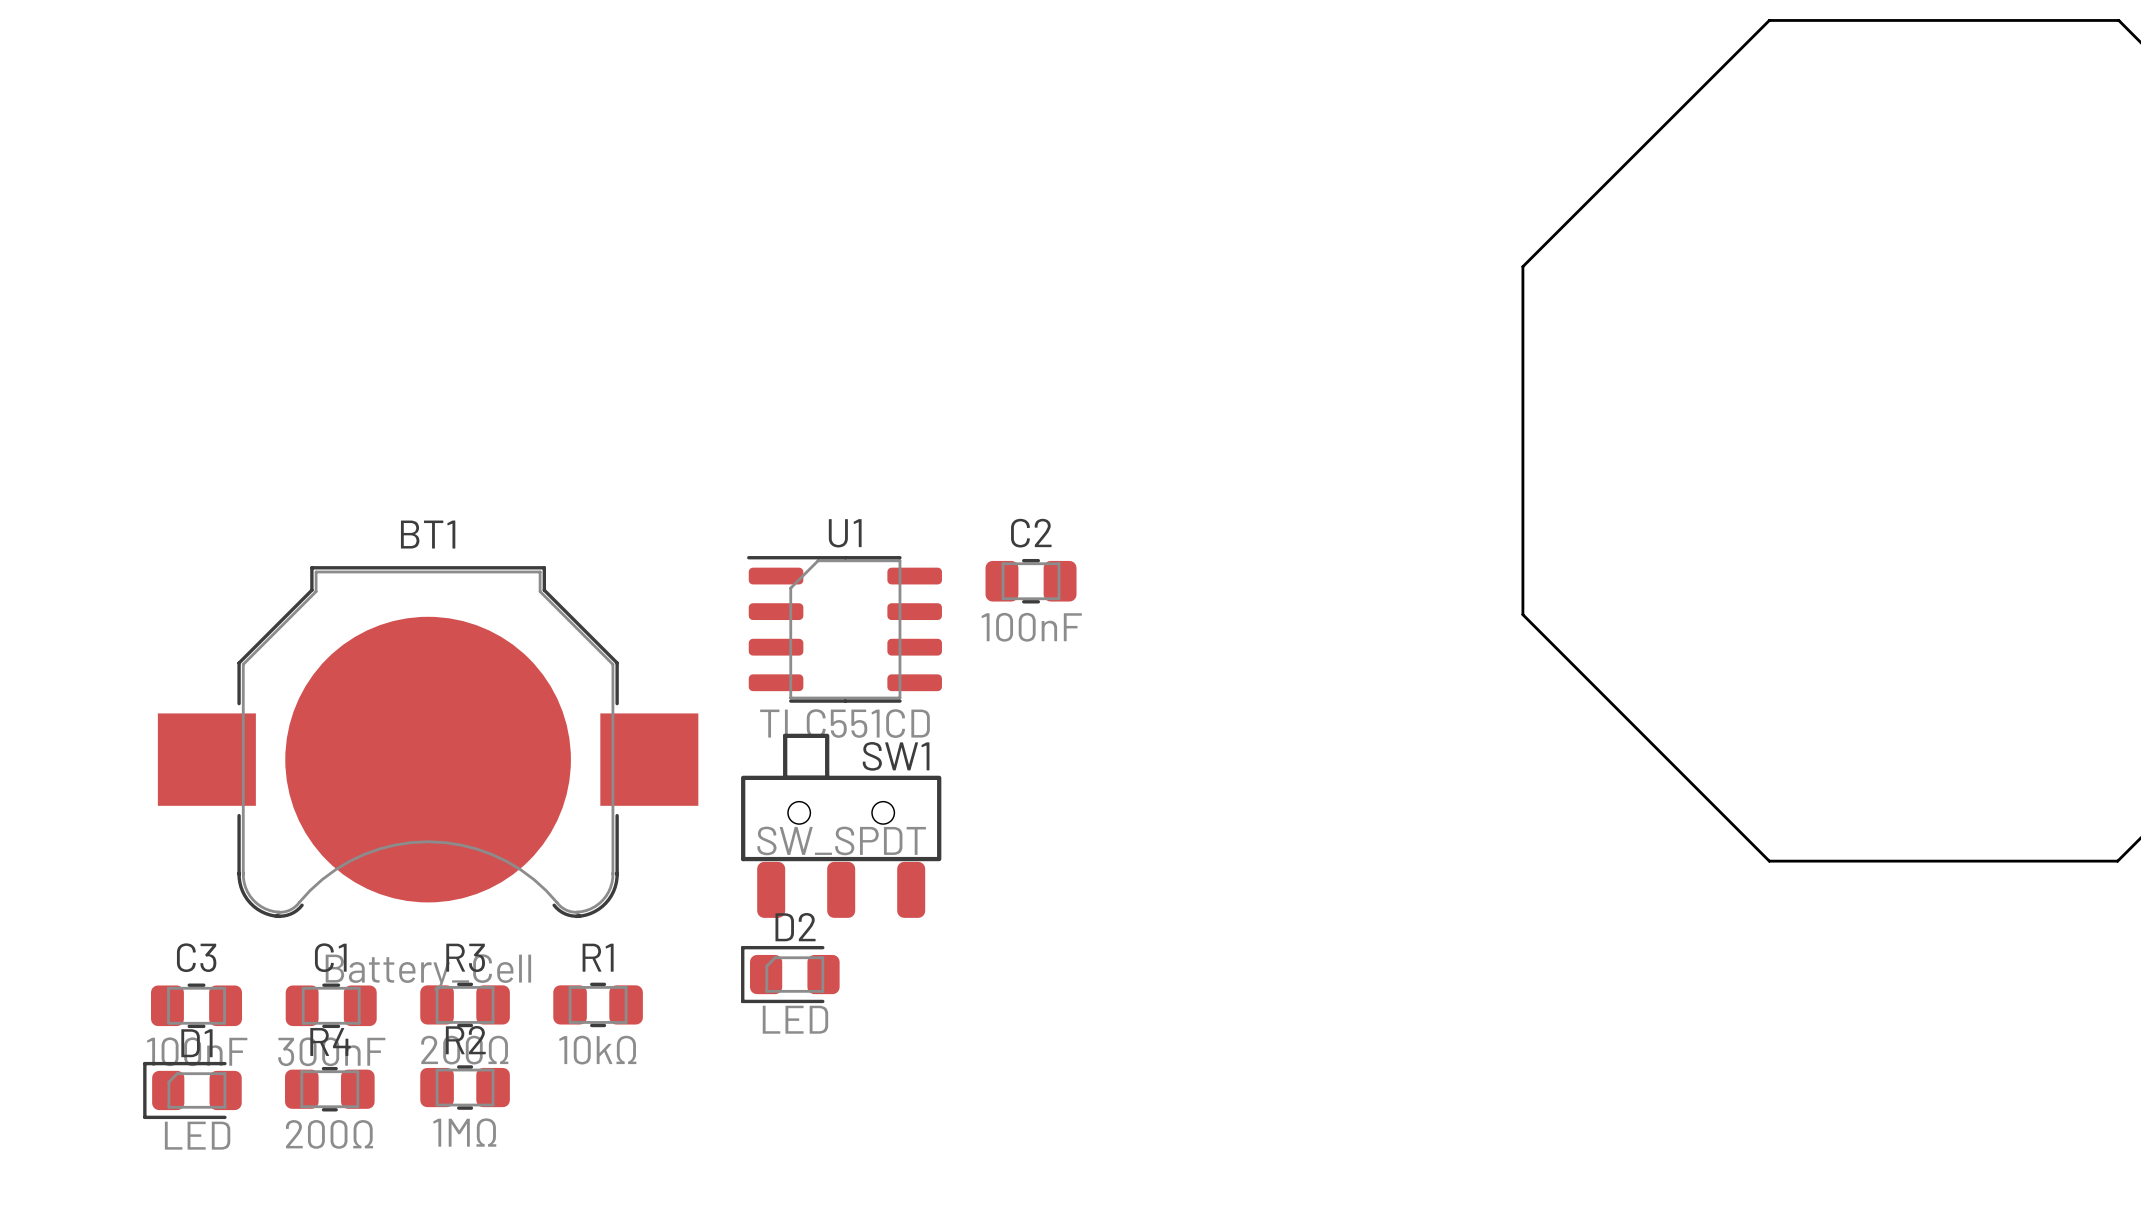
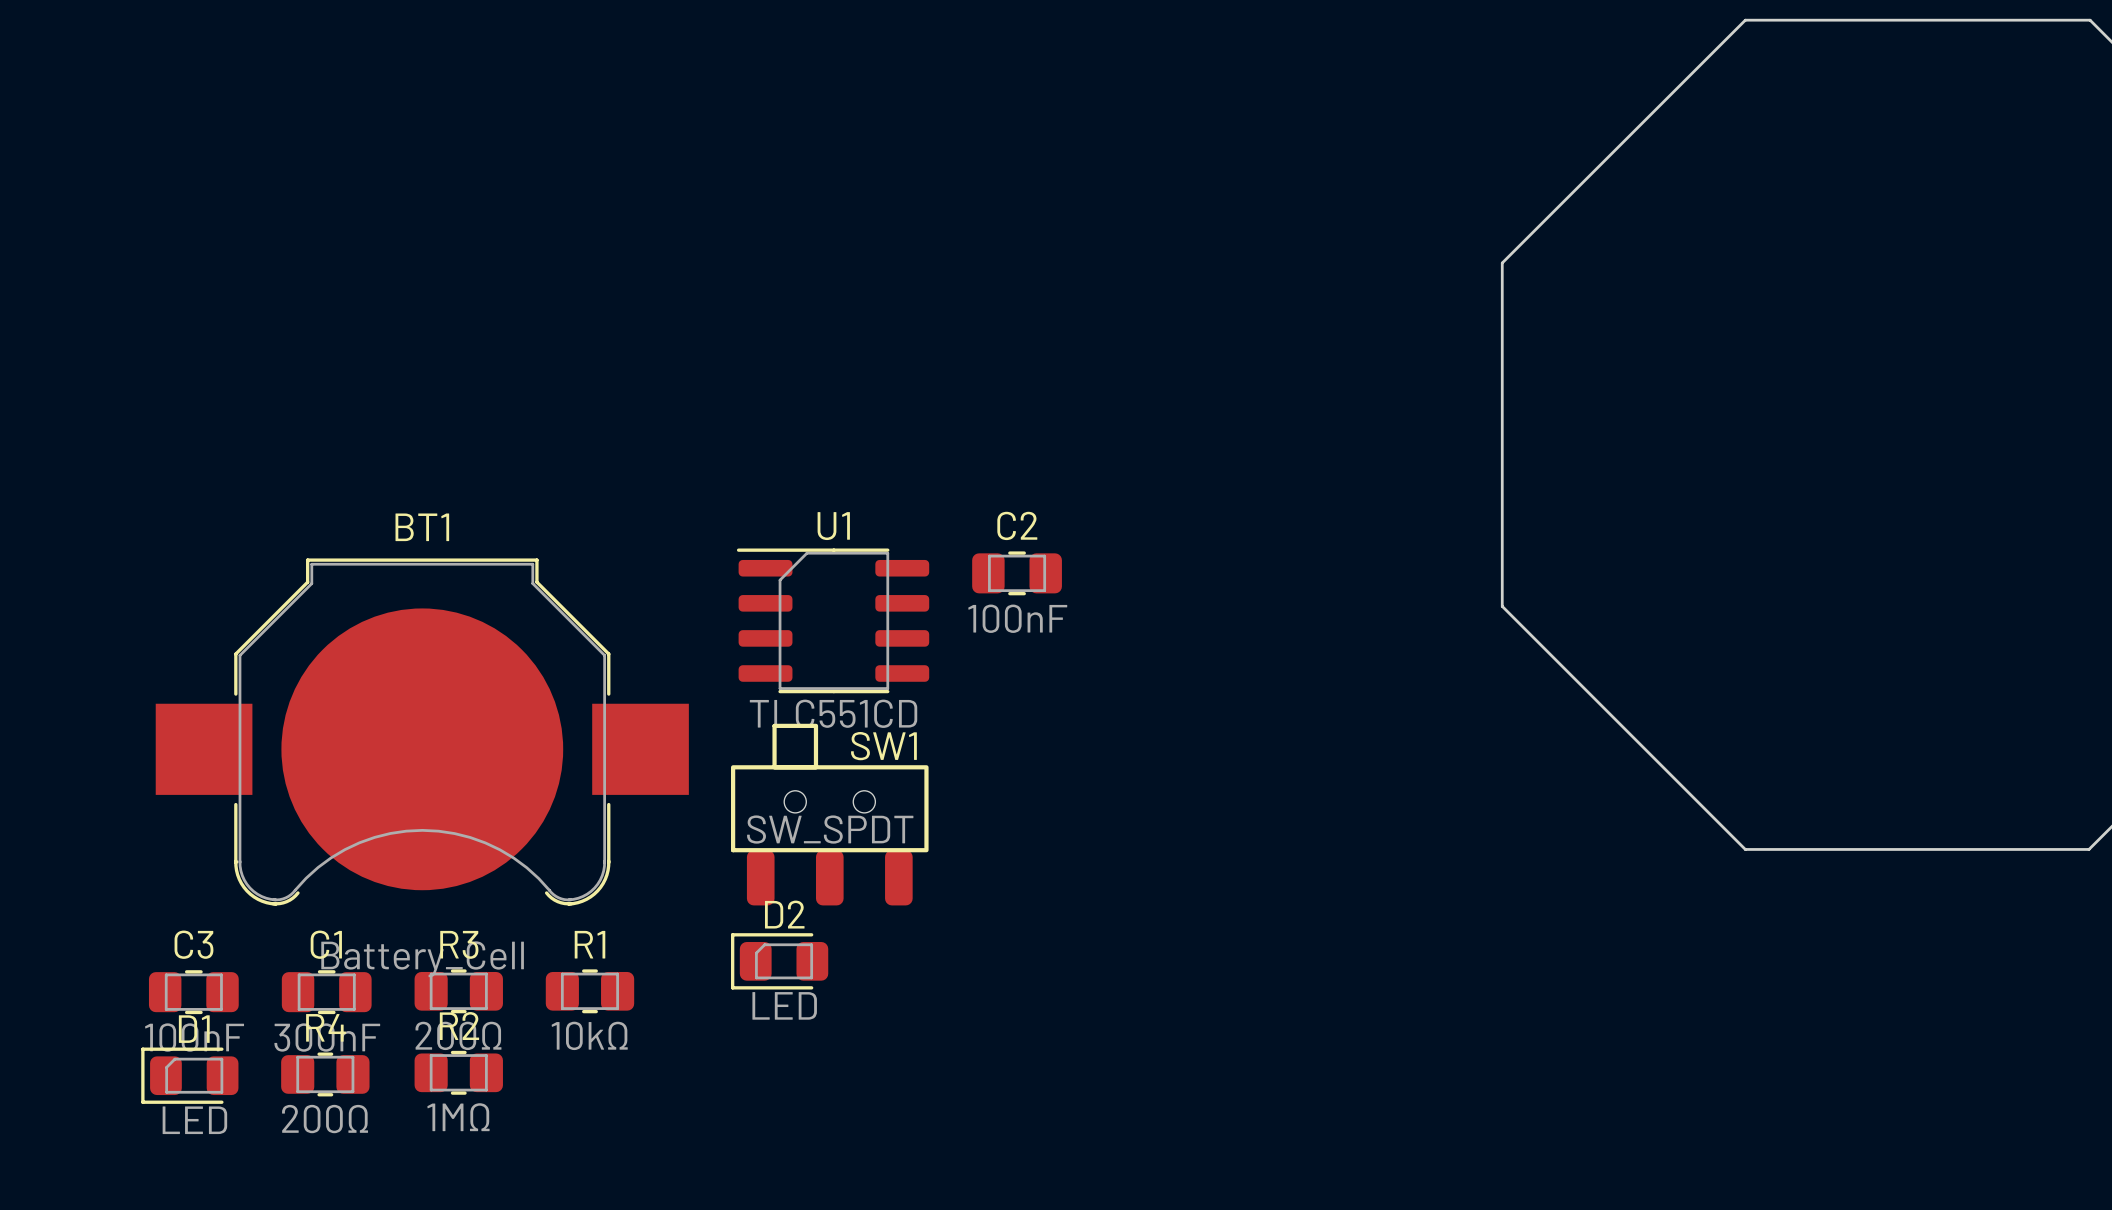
SW1 footprint: [741, 733, 942, 918] -> [731, 723, 929, 906]

